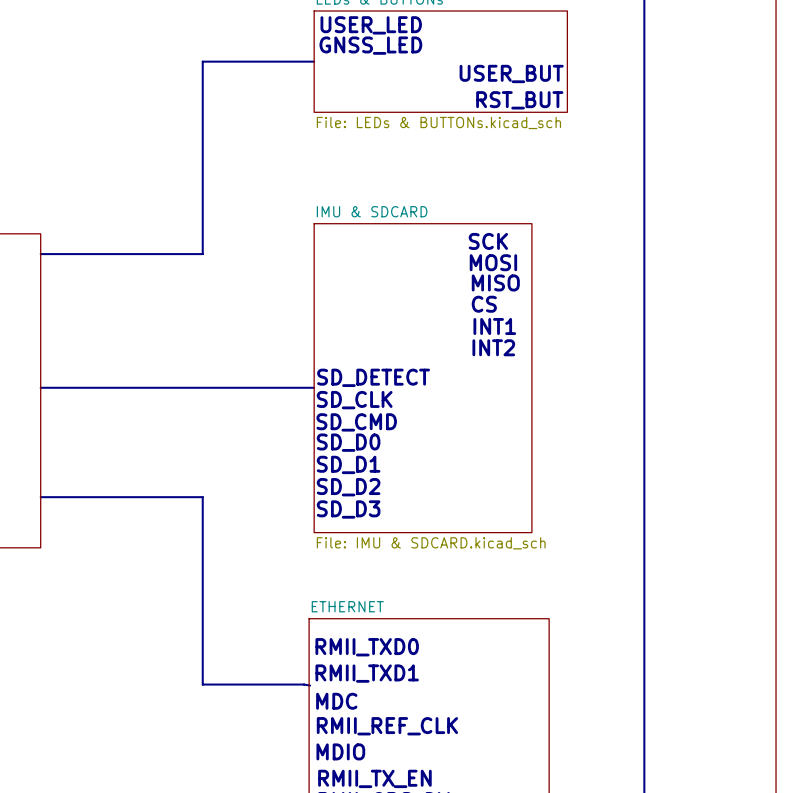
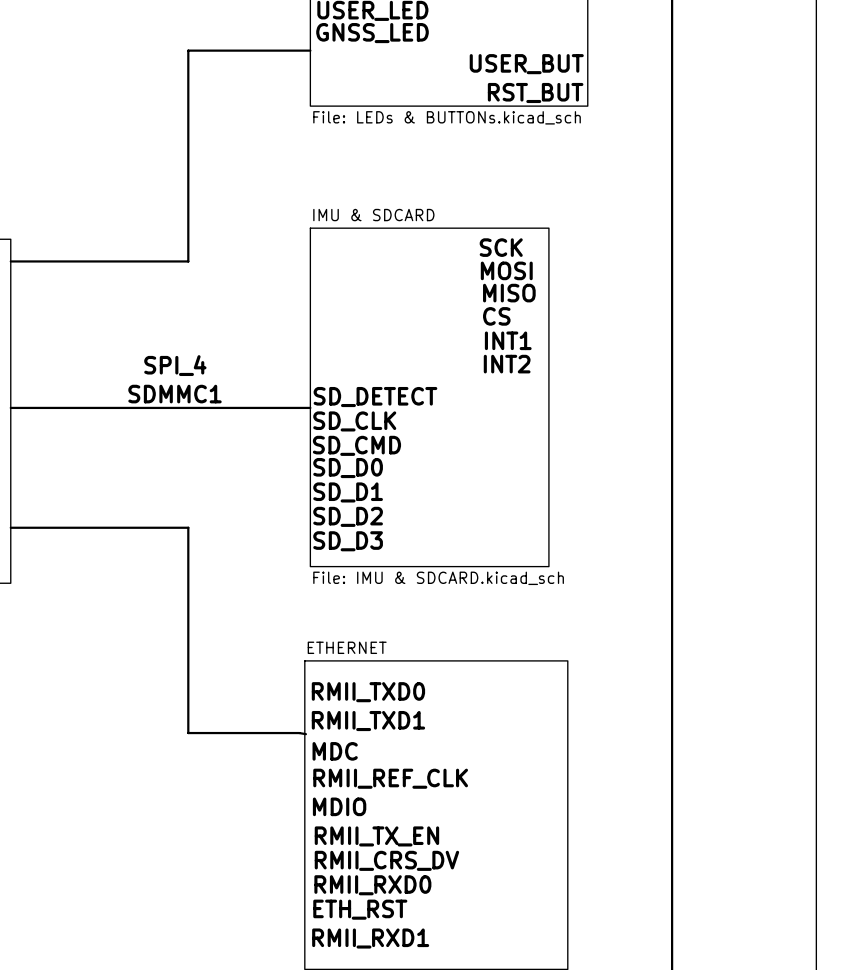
text: none -> SPI_4 (175, 365)
text: none -> SDMMC1 (174, 394)

